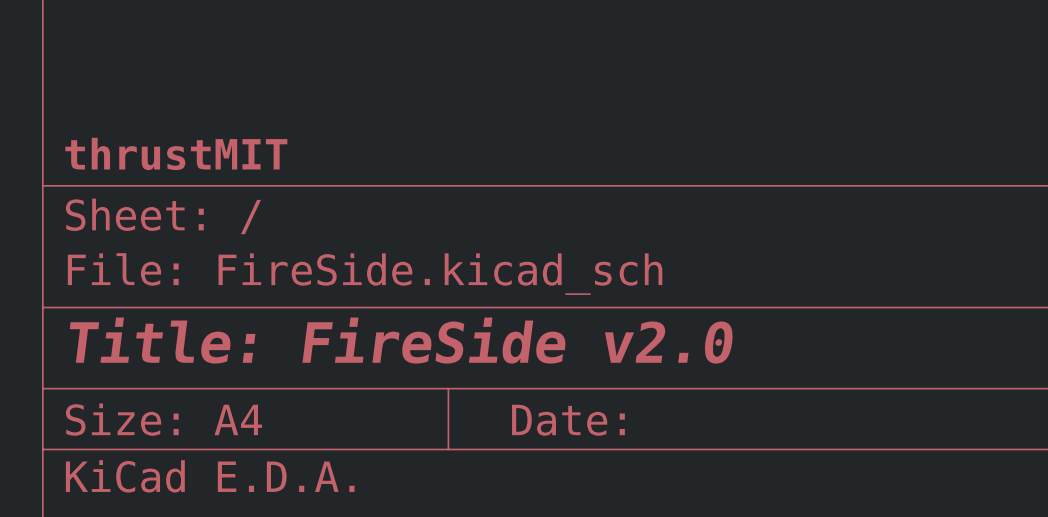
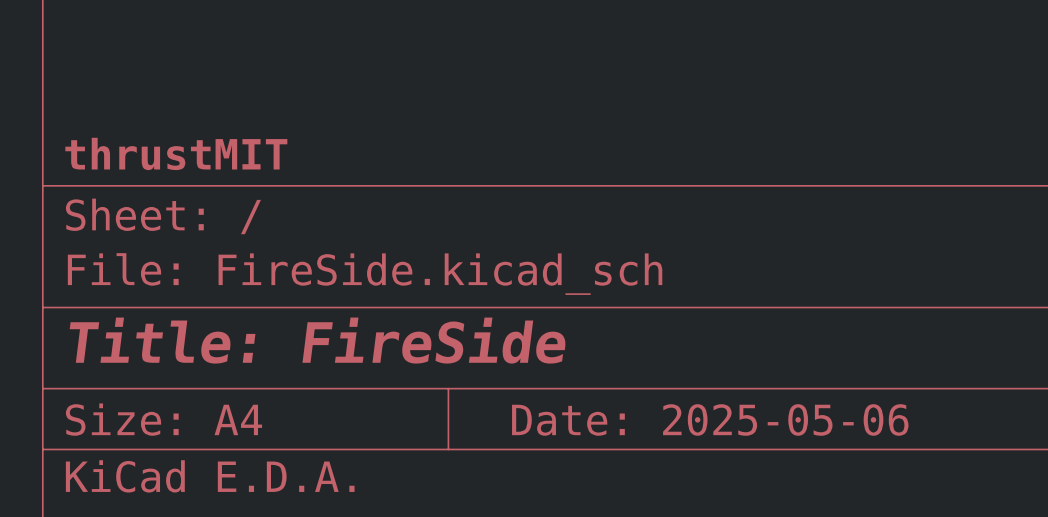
title block: Title: FireSide v2.0 (401, 340) -> Title: FireSide (317, 340)
title block: Date: (568, 420) -> Date: 2025-05-06 (710, 419)

